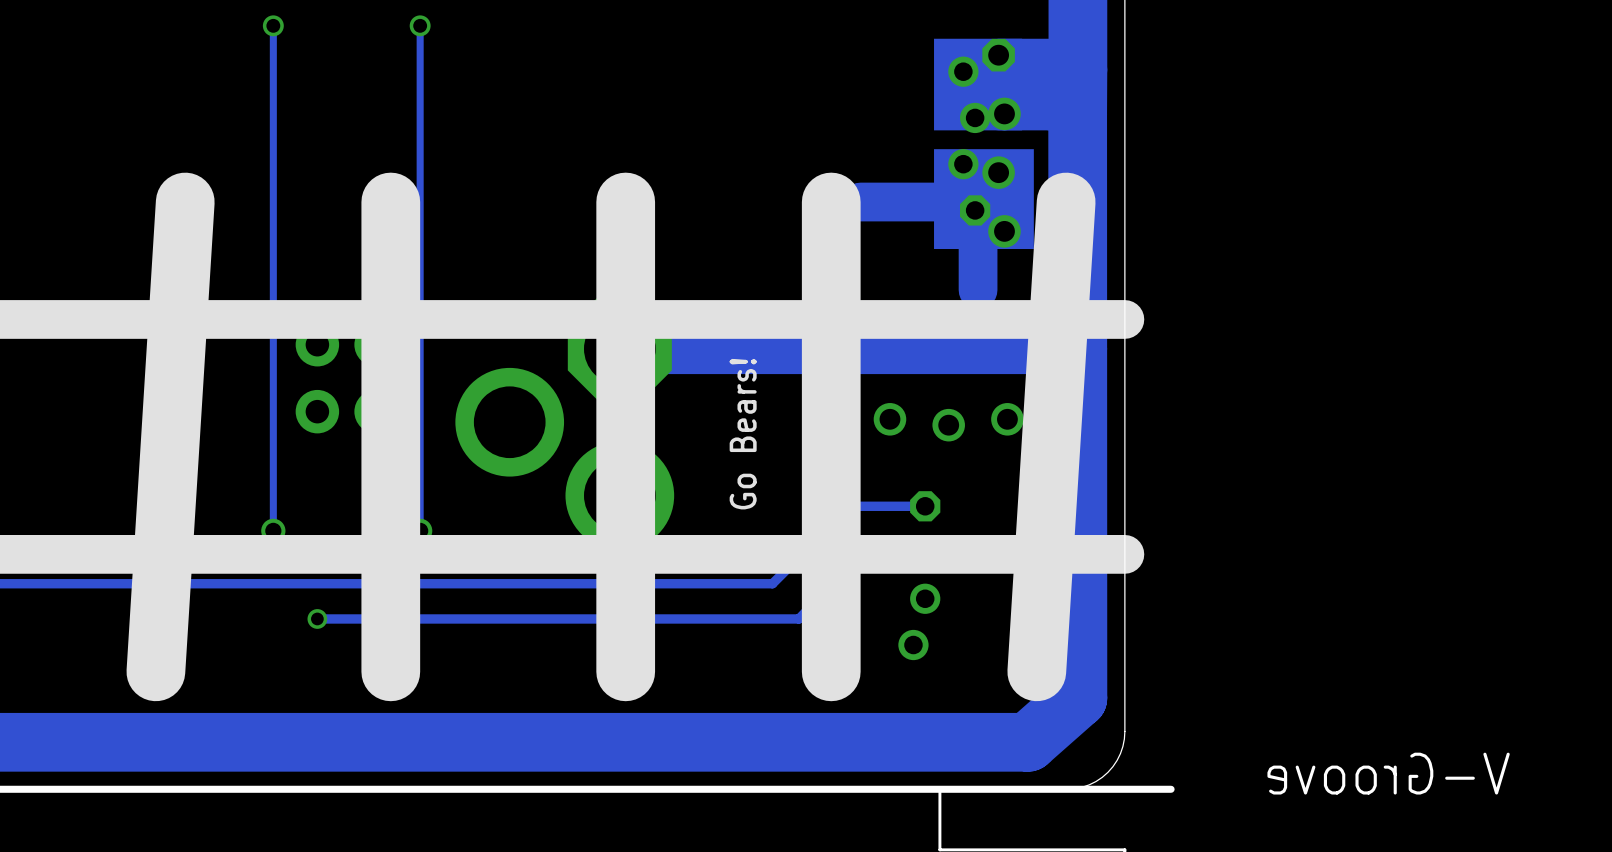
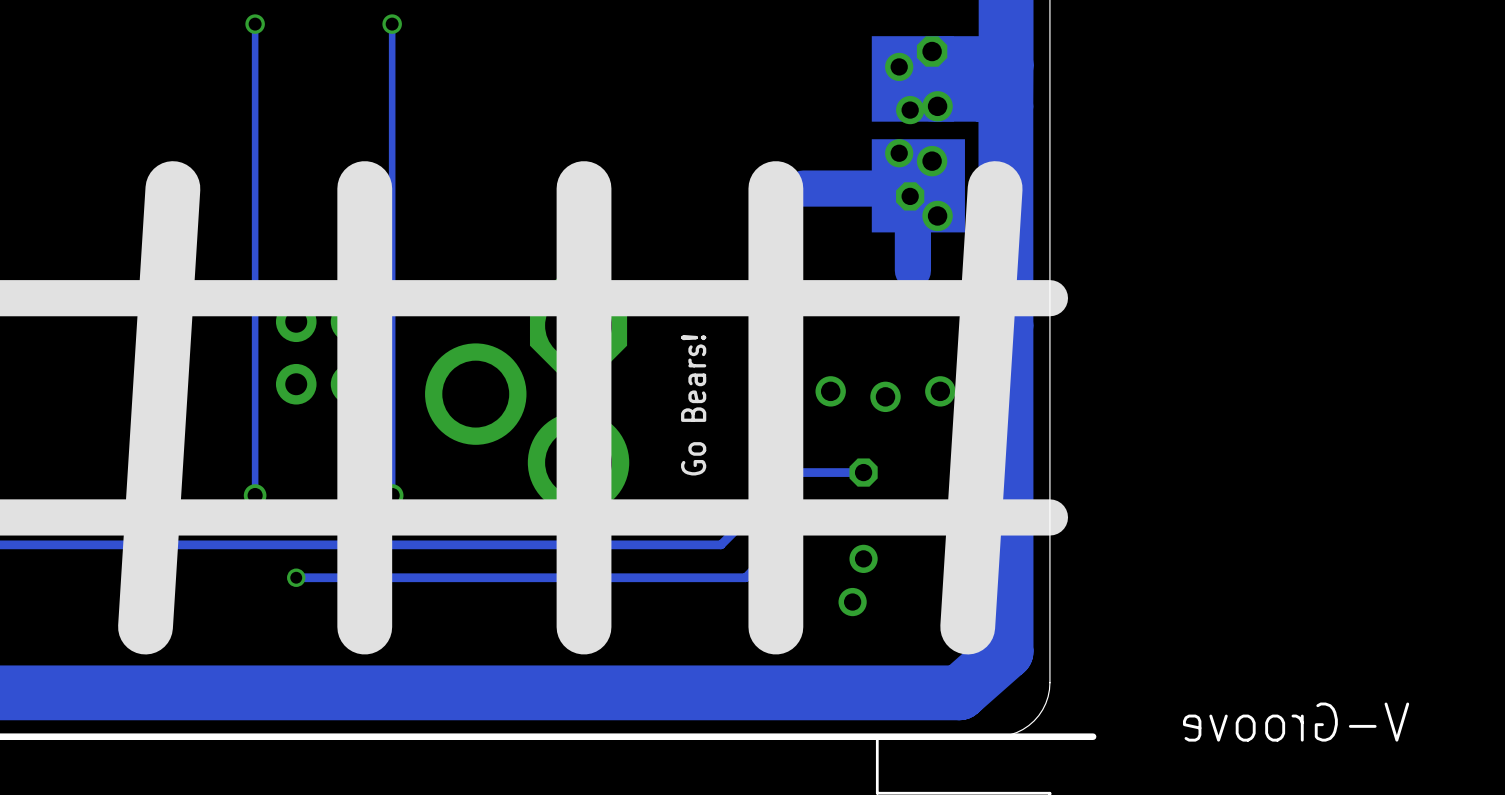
track: (1077, 348) (619, 348) -> none

